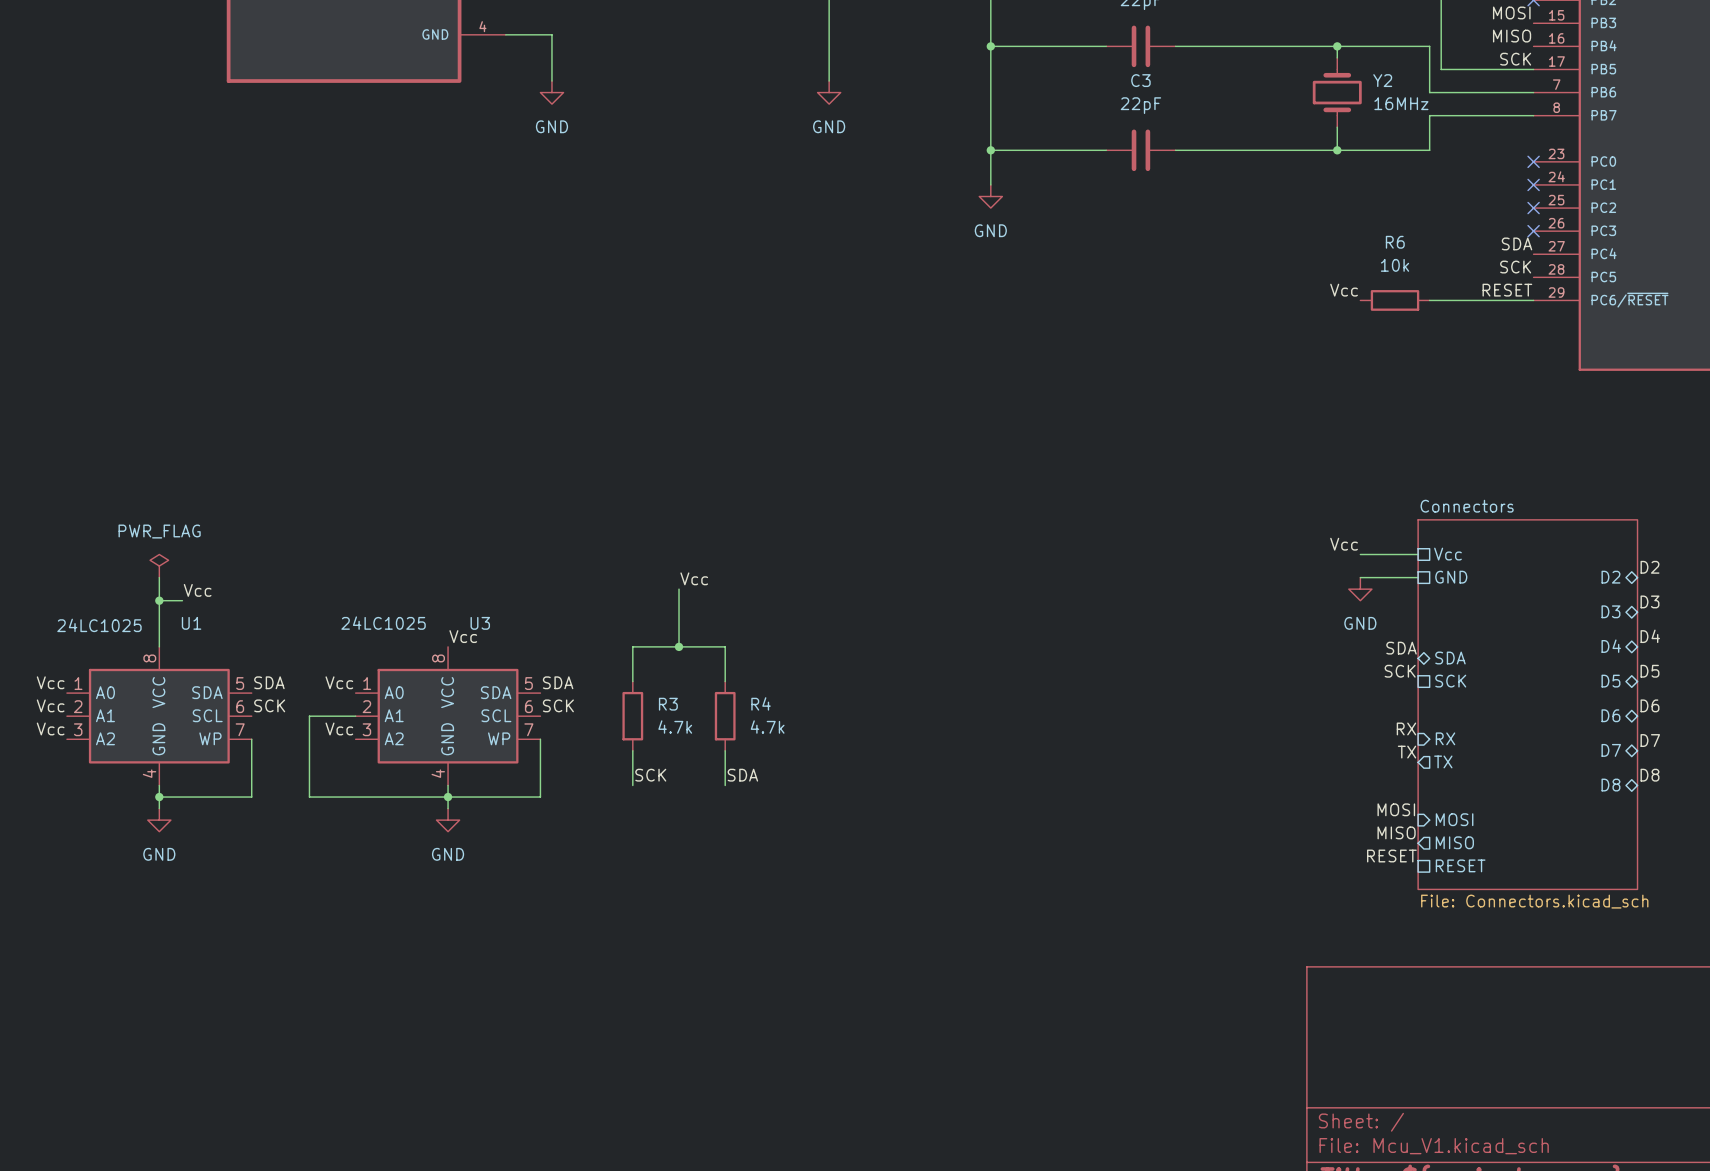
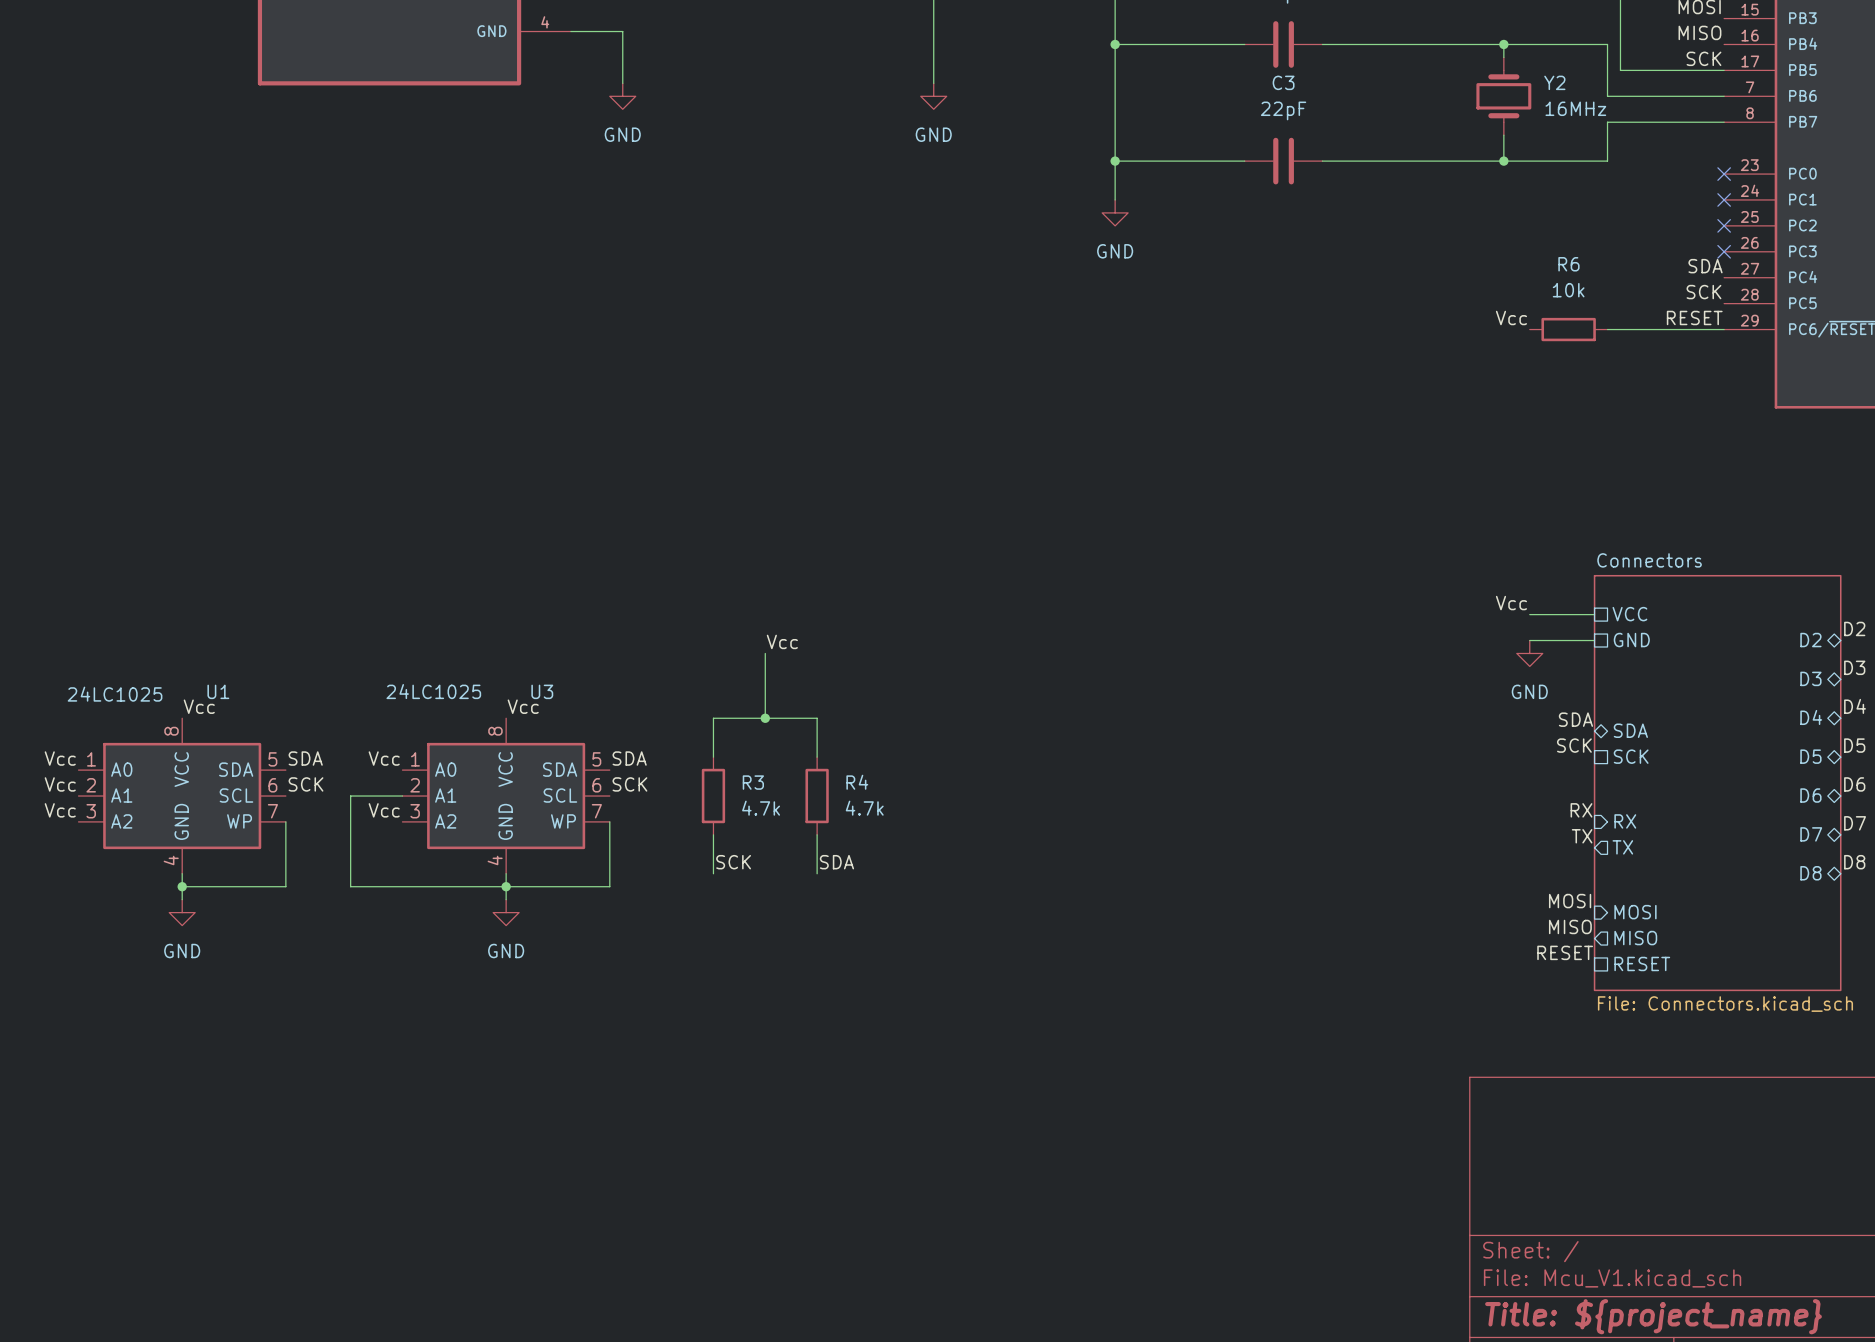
sheet pin: Vcc (1447, 554) -> VCC (1629, 614)
power symbol: PWR_FLAG (159, 566) -> none
wire: (159, 577) (159, 646) -> none
label position: Vcc (197, 590) -> Vcc (199, 706)
wire: (159, 600) (182, 600) -> none
junction: (159, 600) -> none

